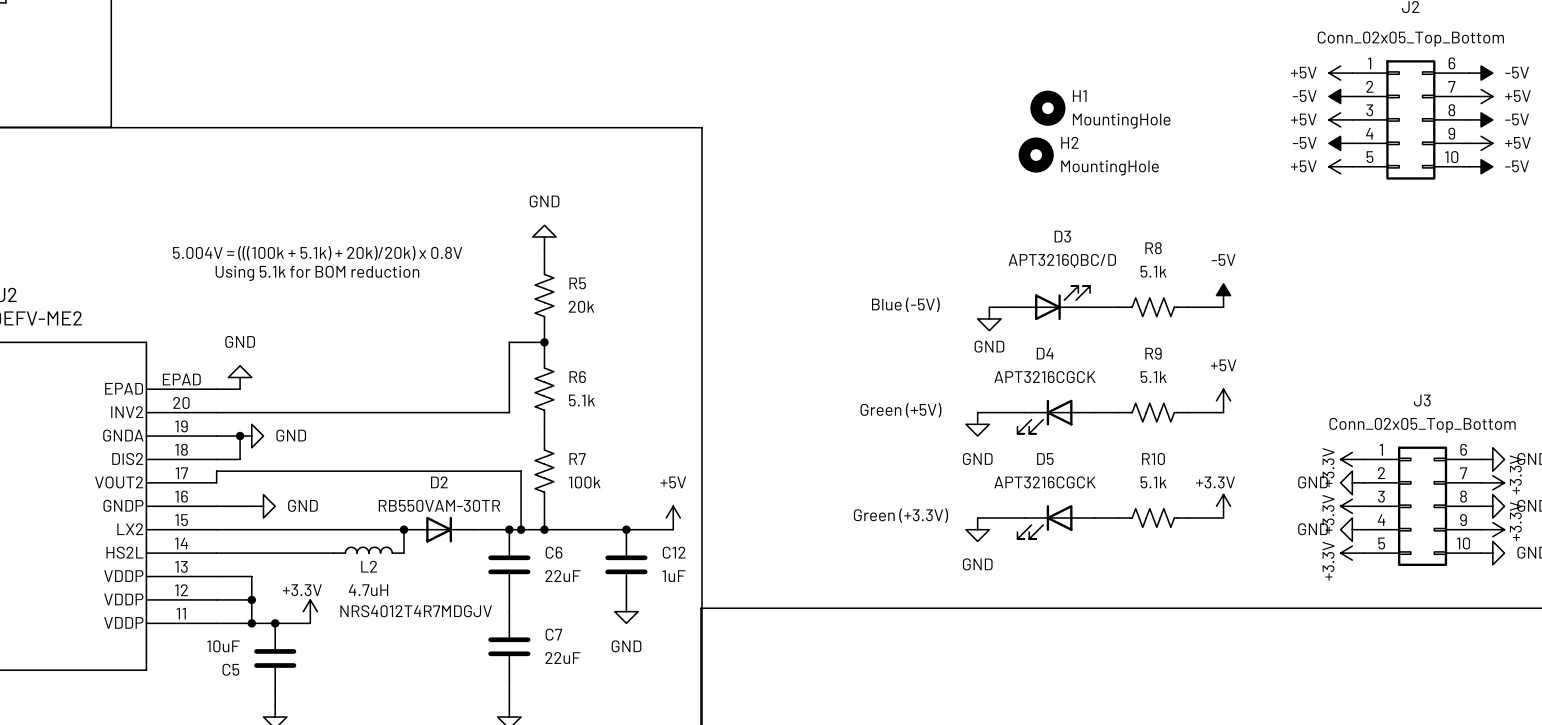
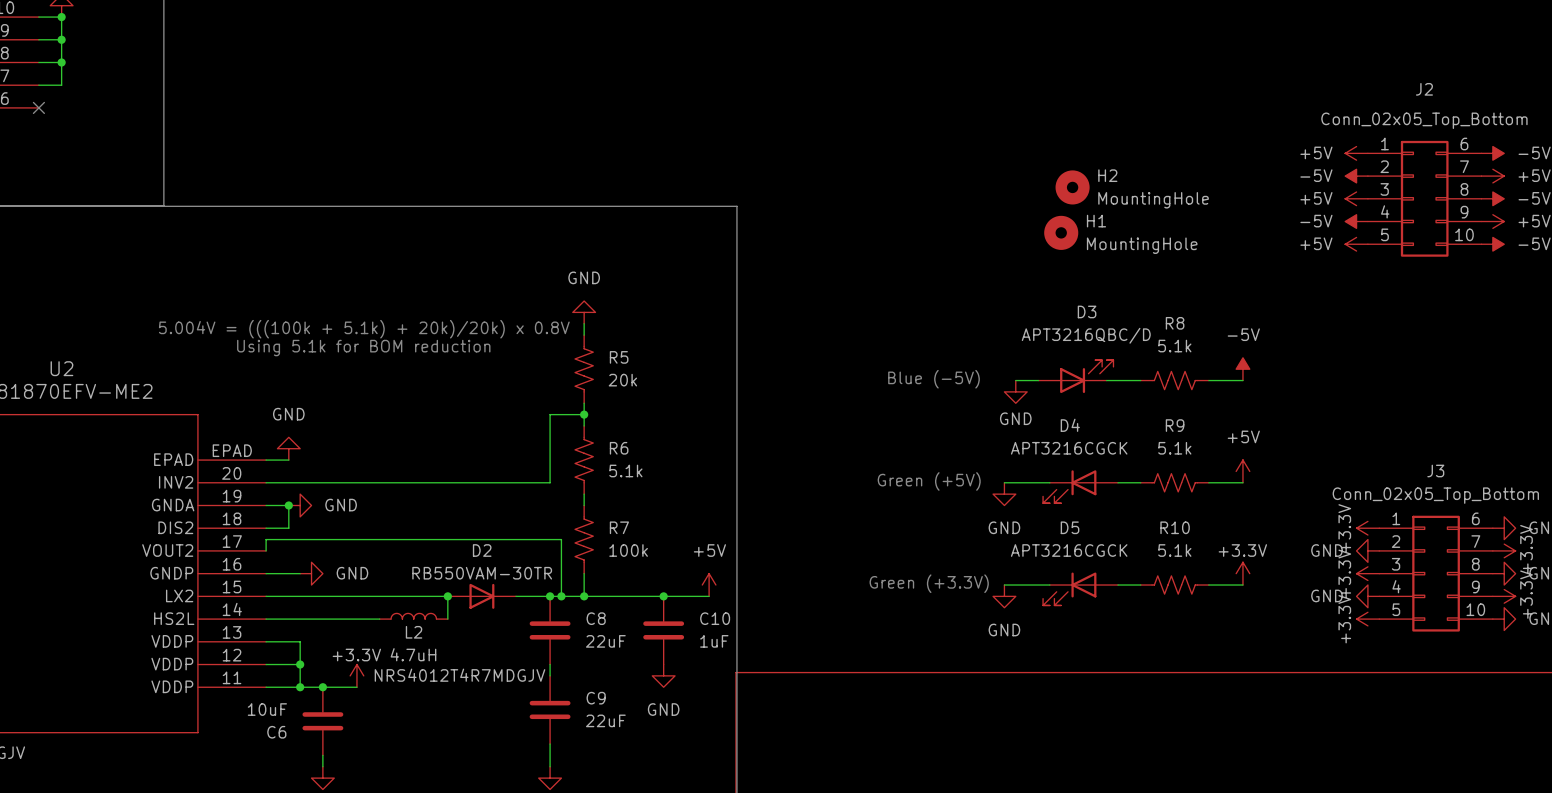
H1 name: H1 (1079, 96) -> H2 (1107, 175)
H2 name: H2 (1069, 142) -> H1 (1096, 221)
C6 name: C6 (554, 552) -> C8 (596, 618)
C12 name: C12 (674, 552) -> C10 (715, 618)
C7 name: C7 (553, 634) -> C9 (596, 698)
C5 name: C5 (230, 669) -> C6 (276, 732)

